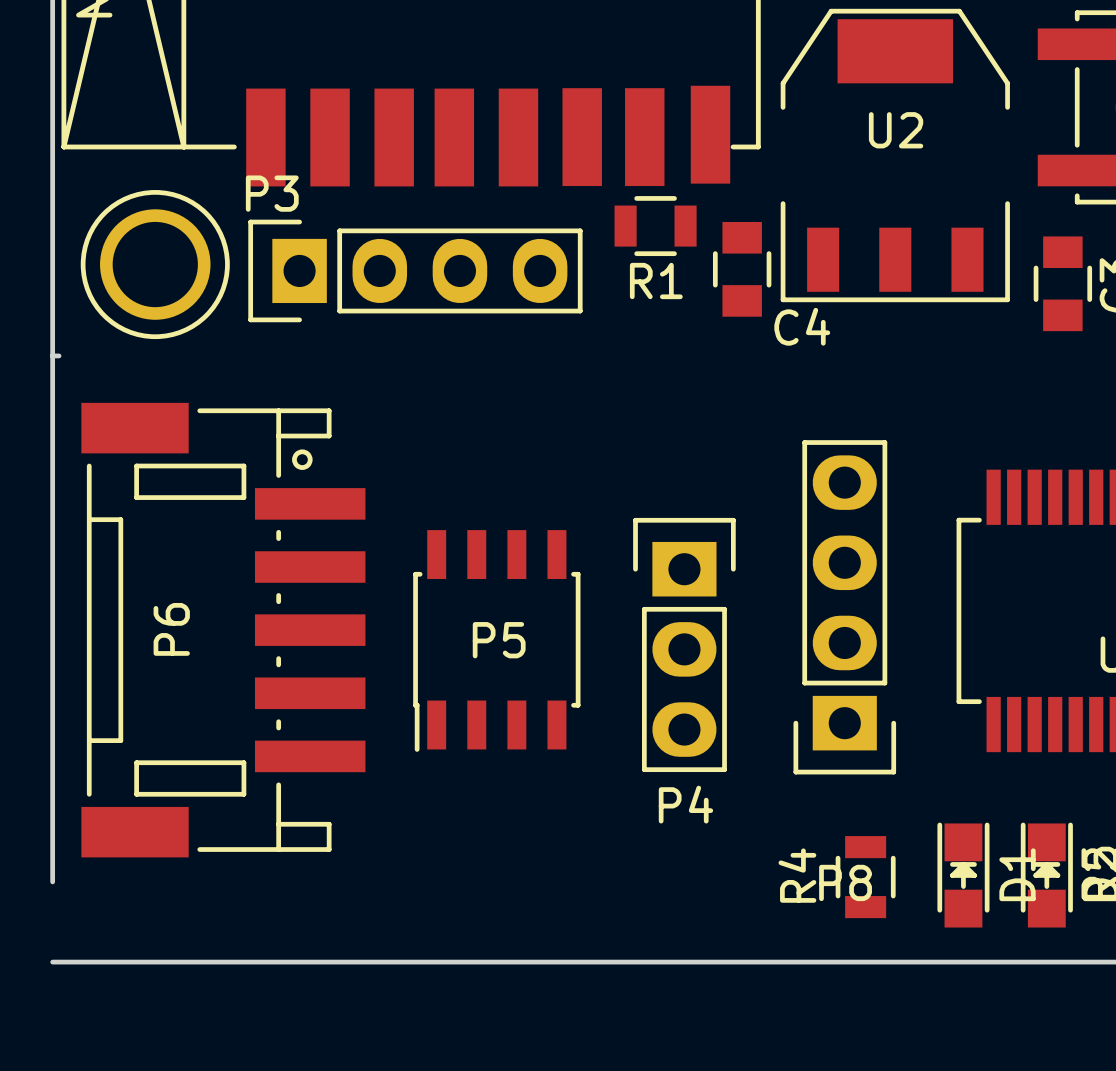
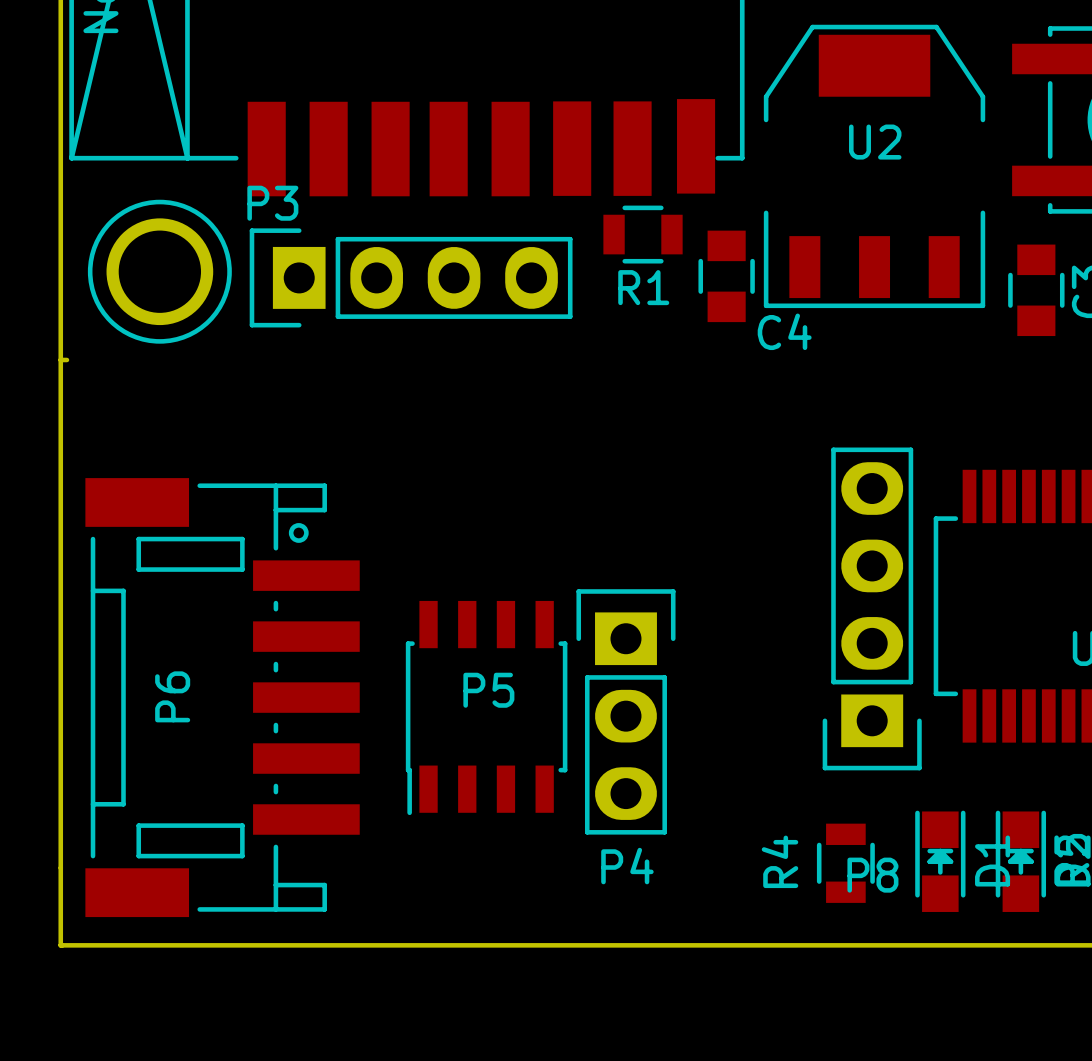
P8 position: (844, 607) -> (872, 608)
P6 position: (223, 630) -> (222, 697)
P5 position: (496, 640) -> (486, 708)
P5 name position: P5 (499, 640) -> P5 (488, 690)
P4 position: (684, 644) -> (625, 711)
board edge: none -> (60, 867) (60, 945)

